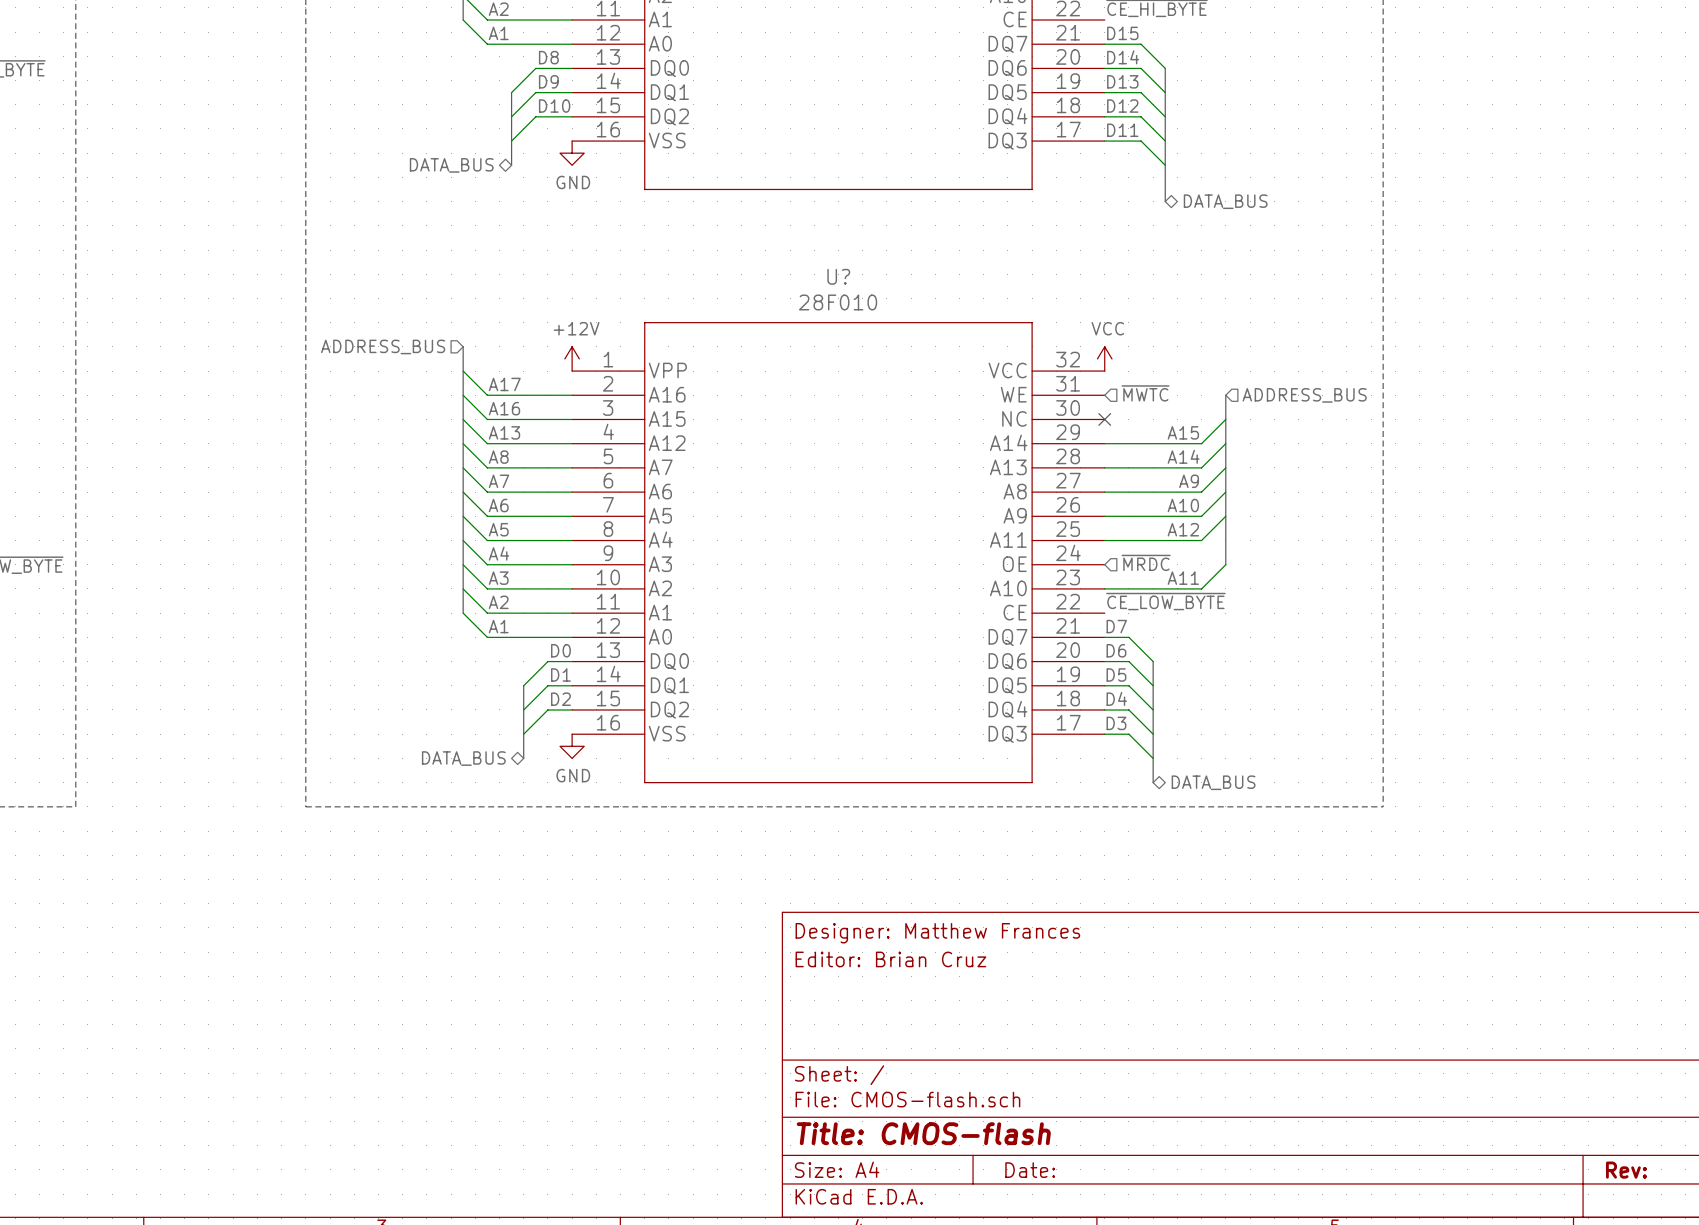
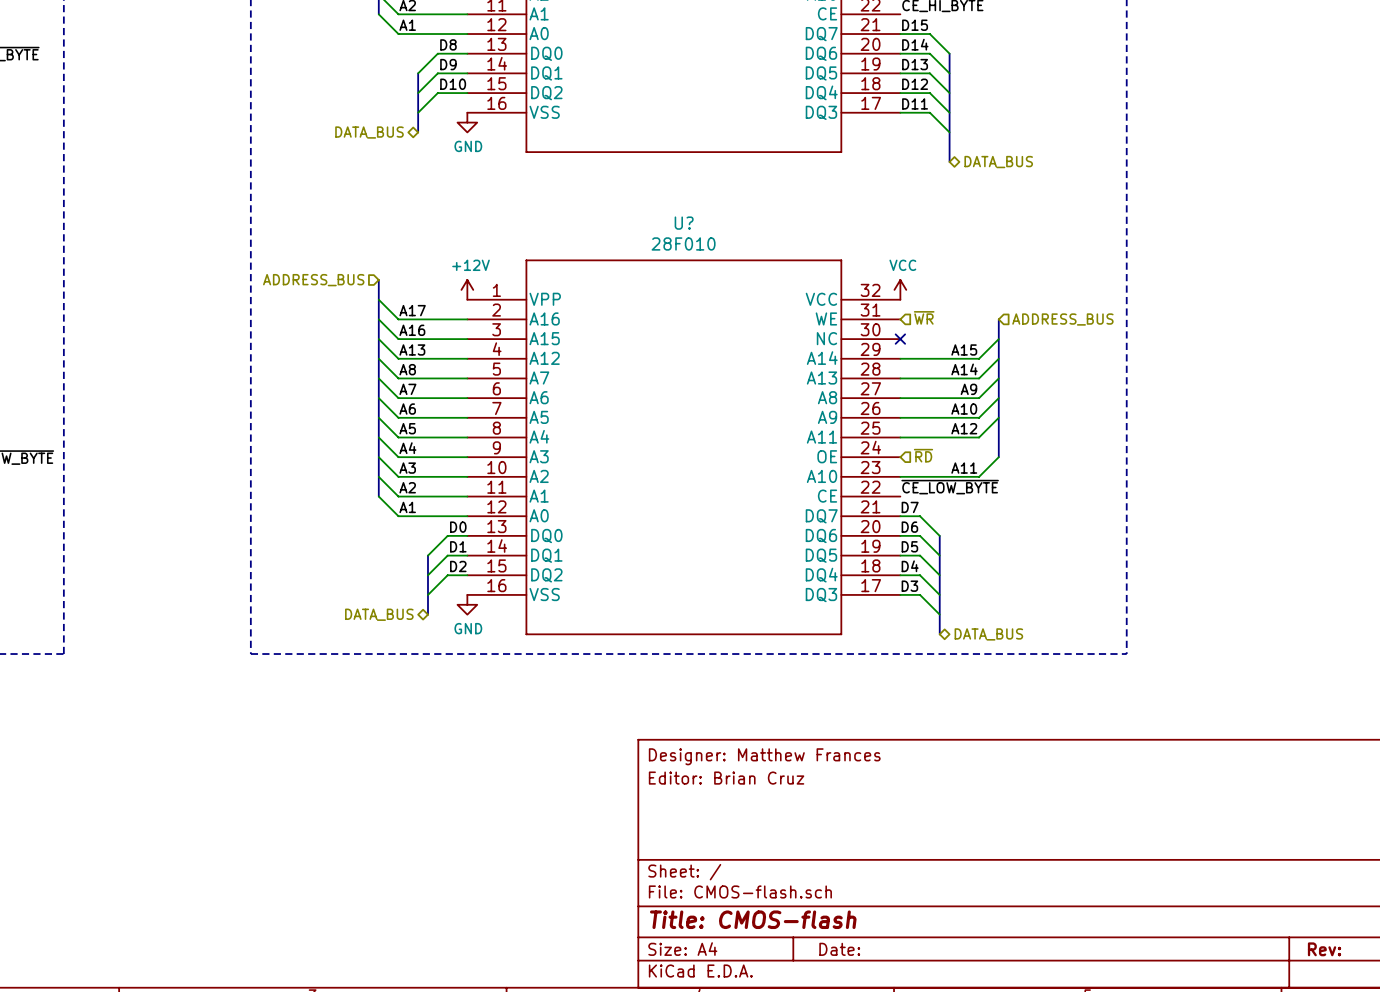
hierarchical label: ~{MWTC} (1145, 393) -> ~{WR} (924, 317)
hierarchical label: ~{MRDC} (1146, 562) -> ~{RD} (923, 455)

